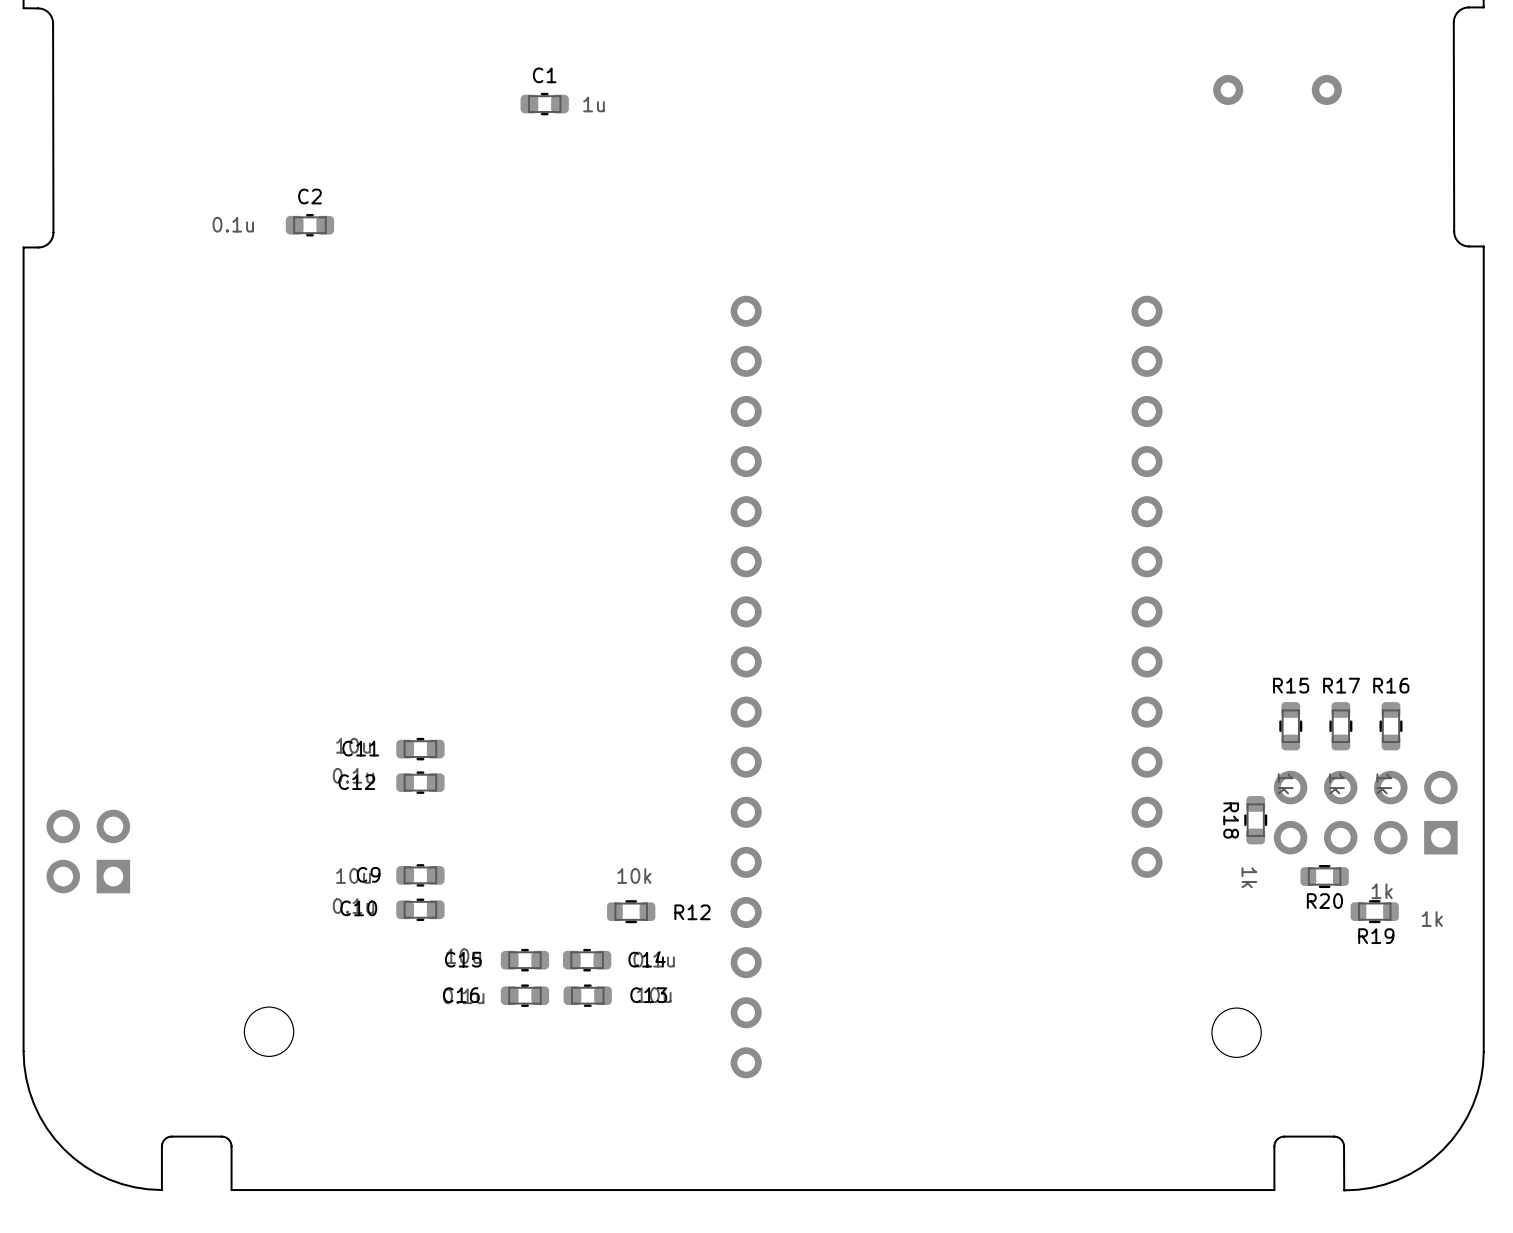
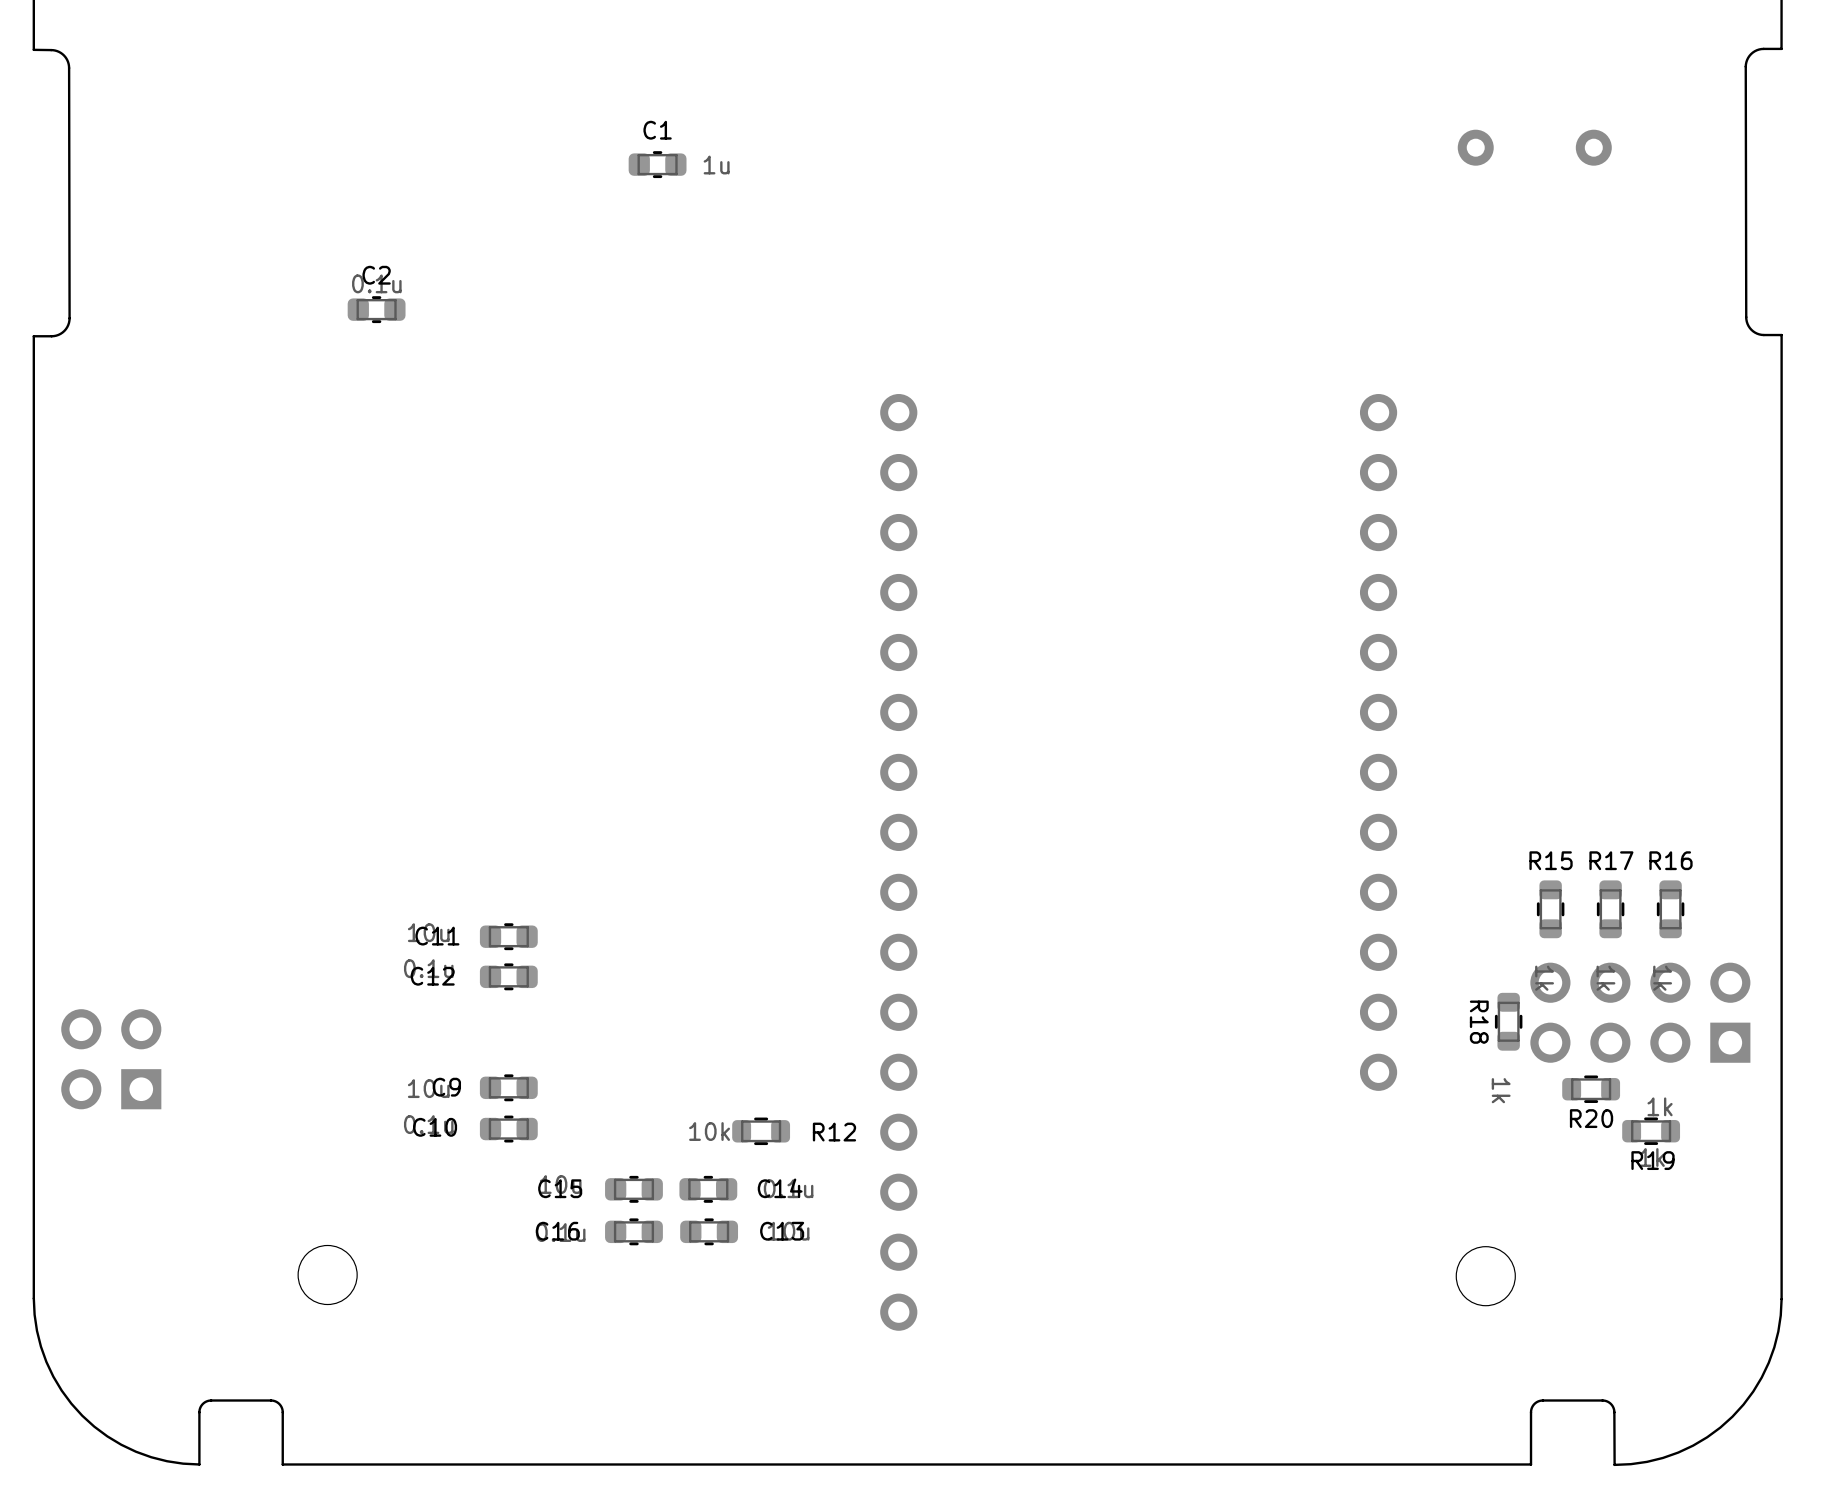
C2 value position: 0.1u (233, 224) -> 0.1u (376, 283)
R12 value position: 10k (634, 876) -> 10k (709, 1131)
R19 value position: 1k (1432, 919) -> 1k (1652, 1157)

